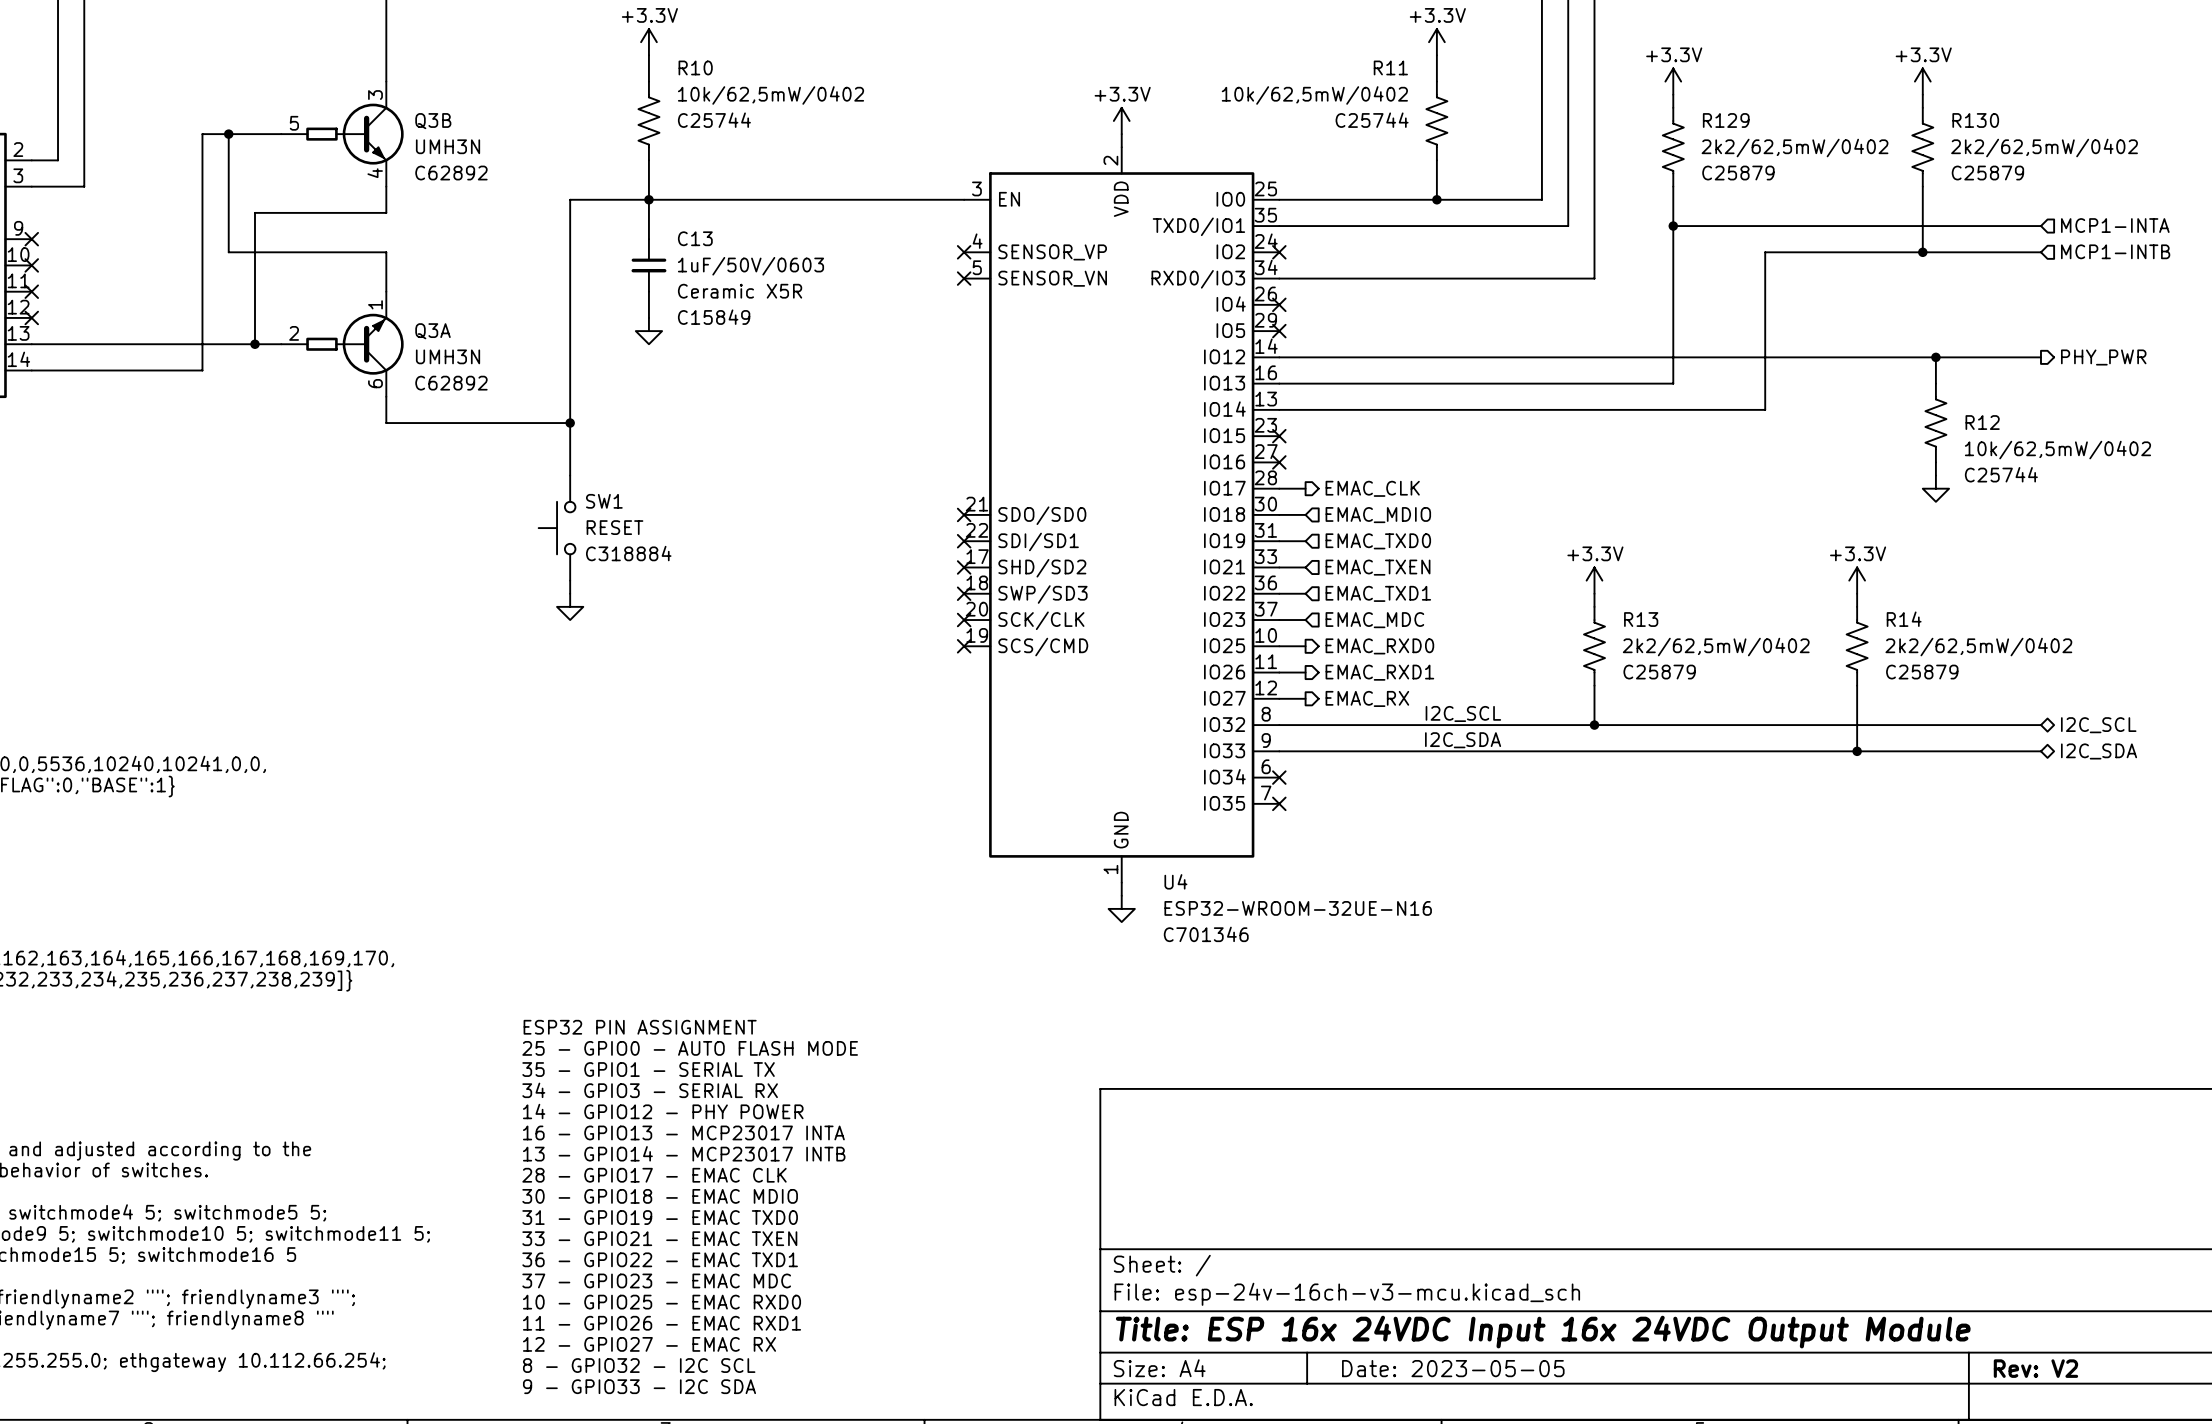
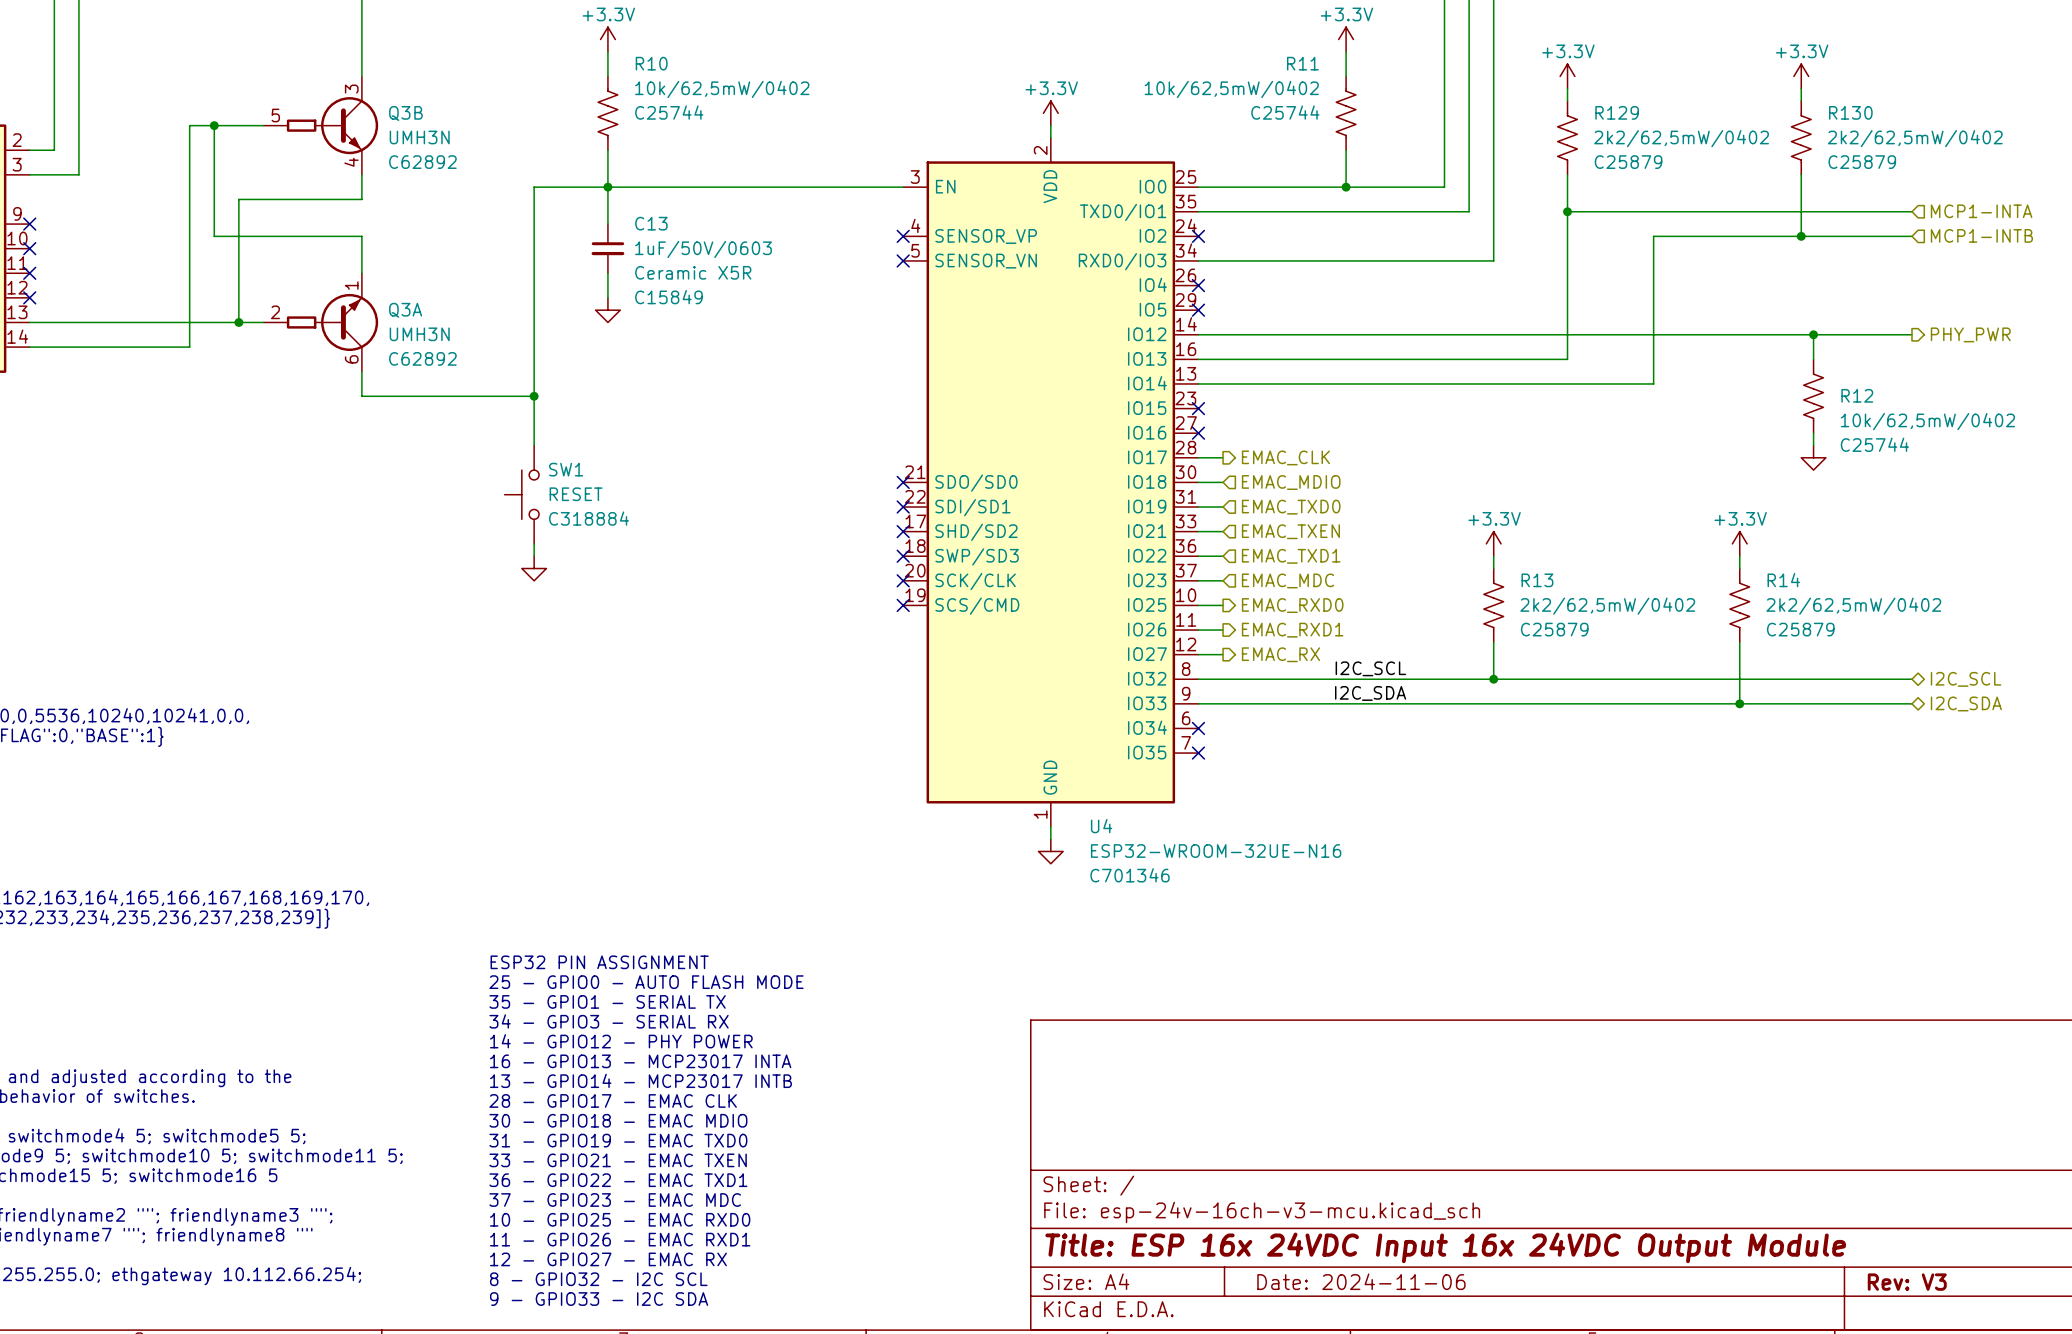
title block: Date: 2023-05-05 (1453, 1368) -> Date: 2024-11-06 (1361, 1281)
title block: Rev: V2 (2035, 1368) -> Rev: V3 (1907, 1282)

